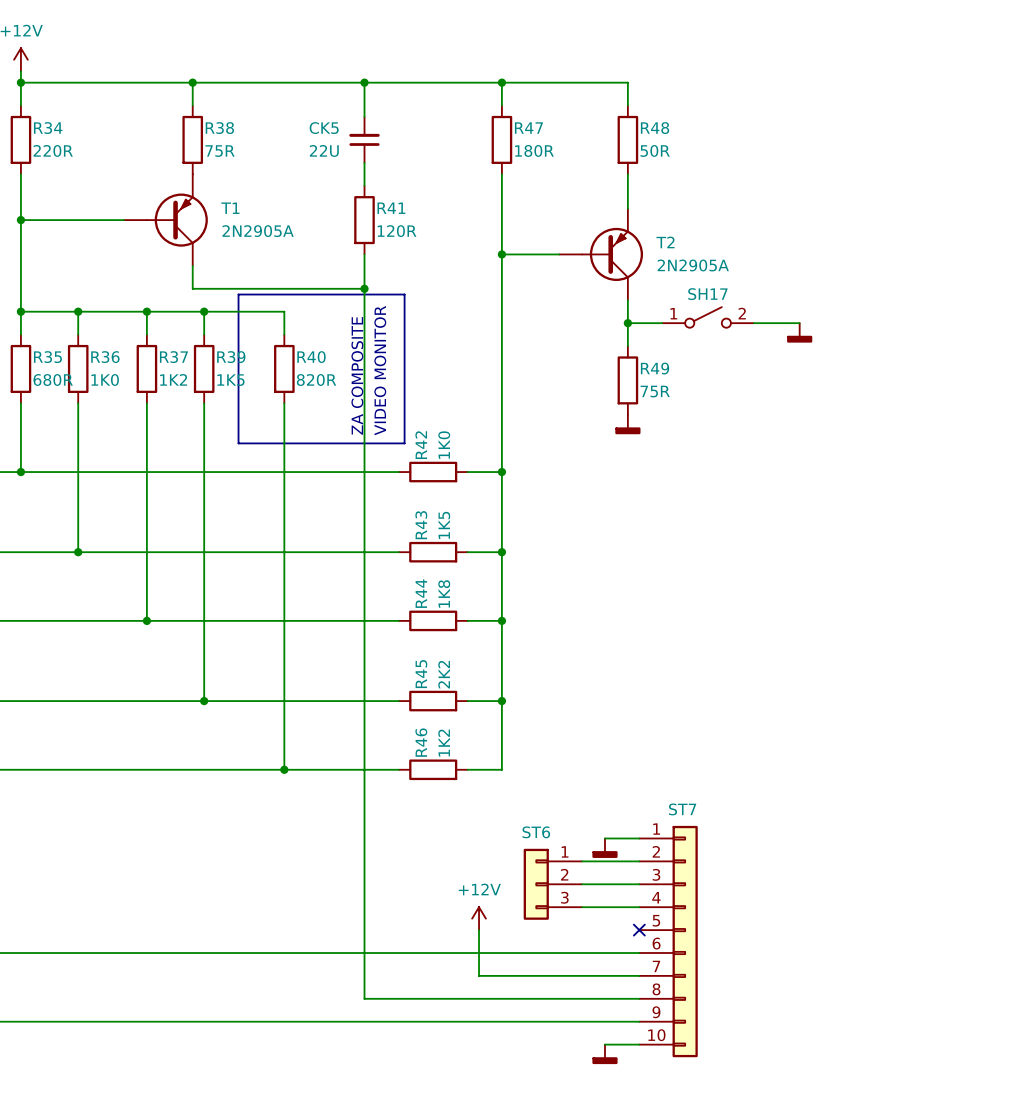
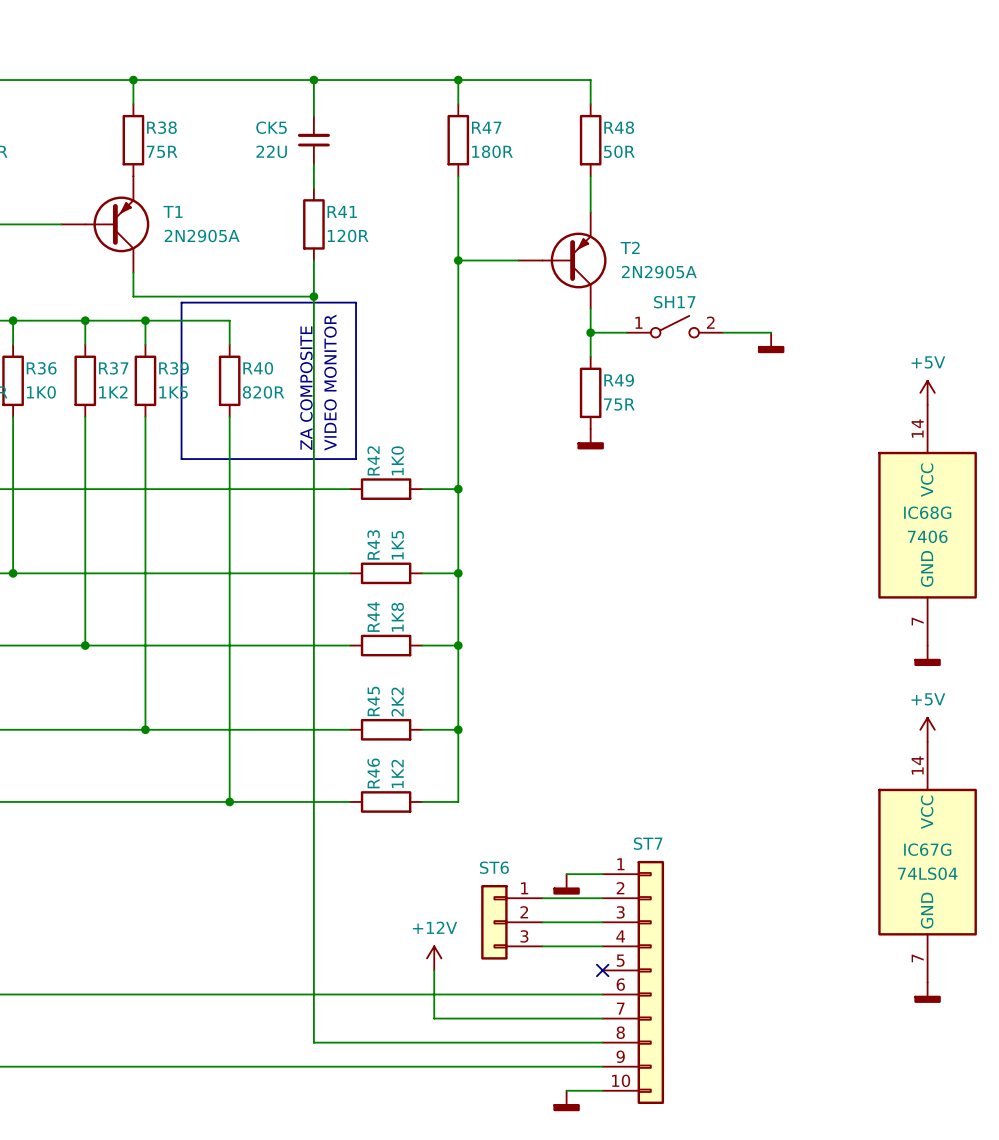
power symbol: none -> +5V (927, 392)
IC68G: none -> 7406 (927, 525)
power symbol: none -> (927, 655)
power symbol: none -> +5V (927, 729)
IC67G: none -> 74LS04 (927, 862)
power symbol: none -> (927, 992)

